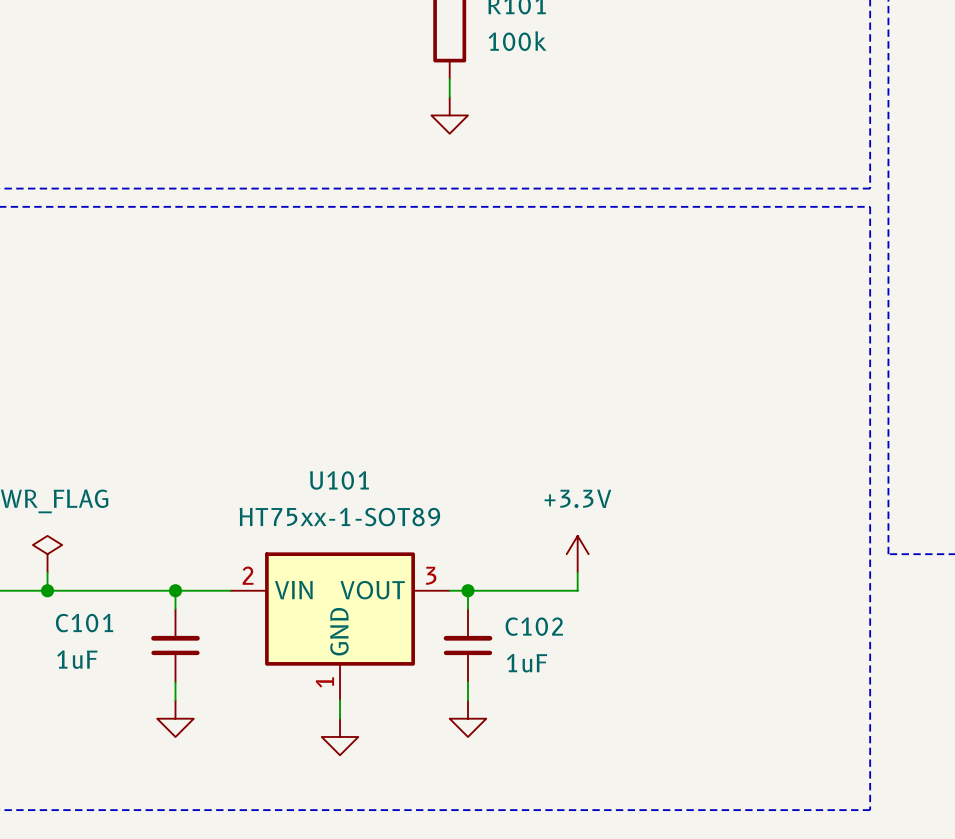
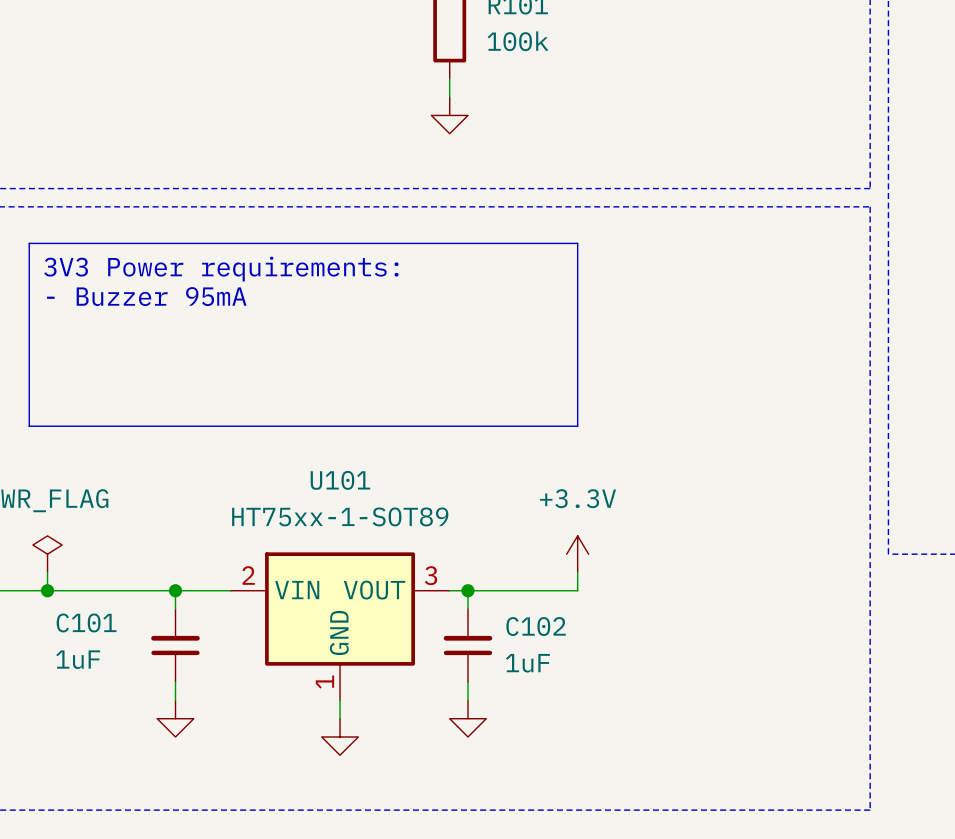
line: none -> (29, 243) (577, 243) (577, 426) (29, 426) (29, 243)
text: none -> 3V3 Power requirements: (221, 269)
text: none -> - Buzzer 95mA (146, 296)

